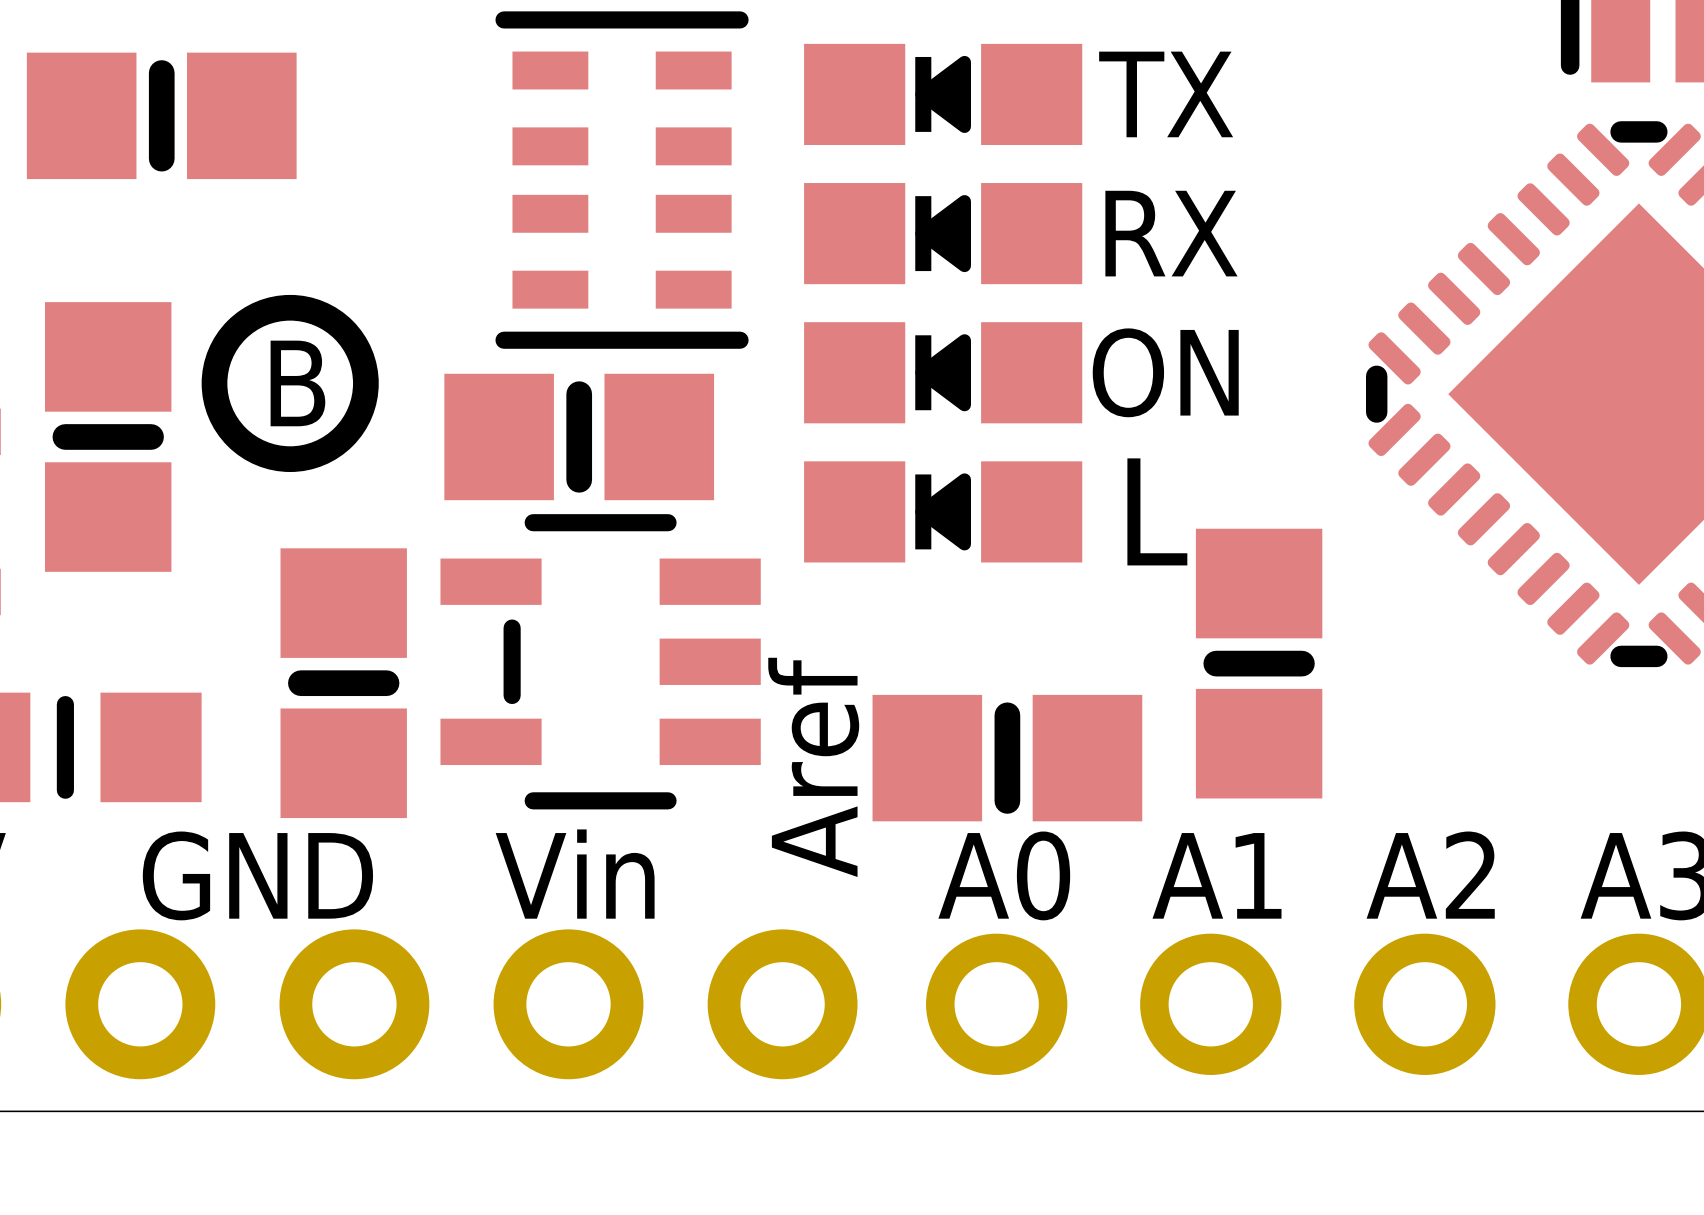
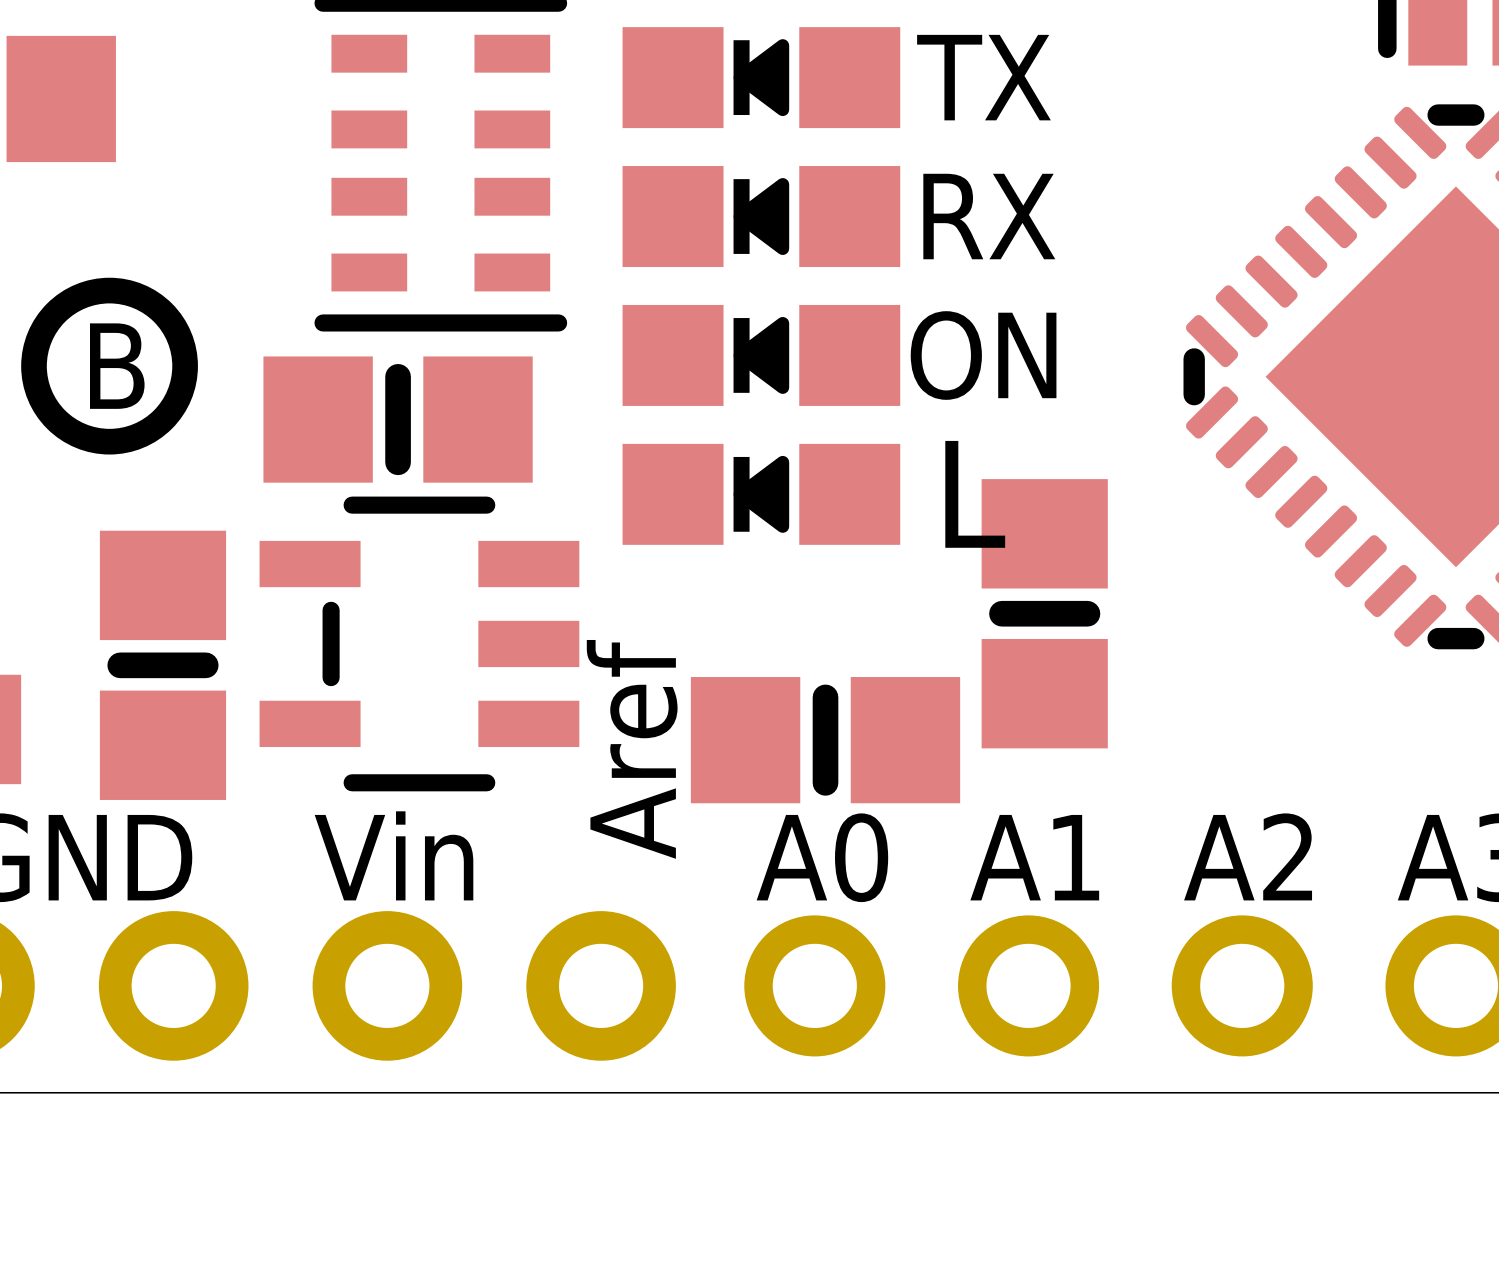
part position: (1259, 663) -> (1044, 613)

